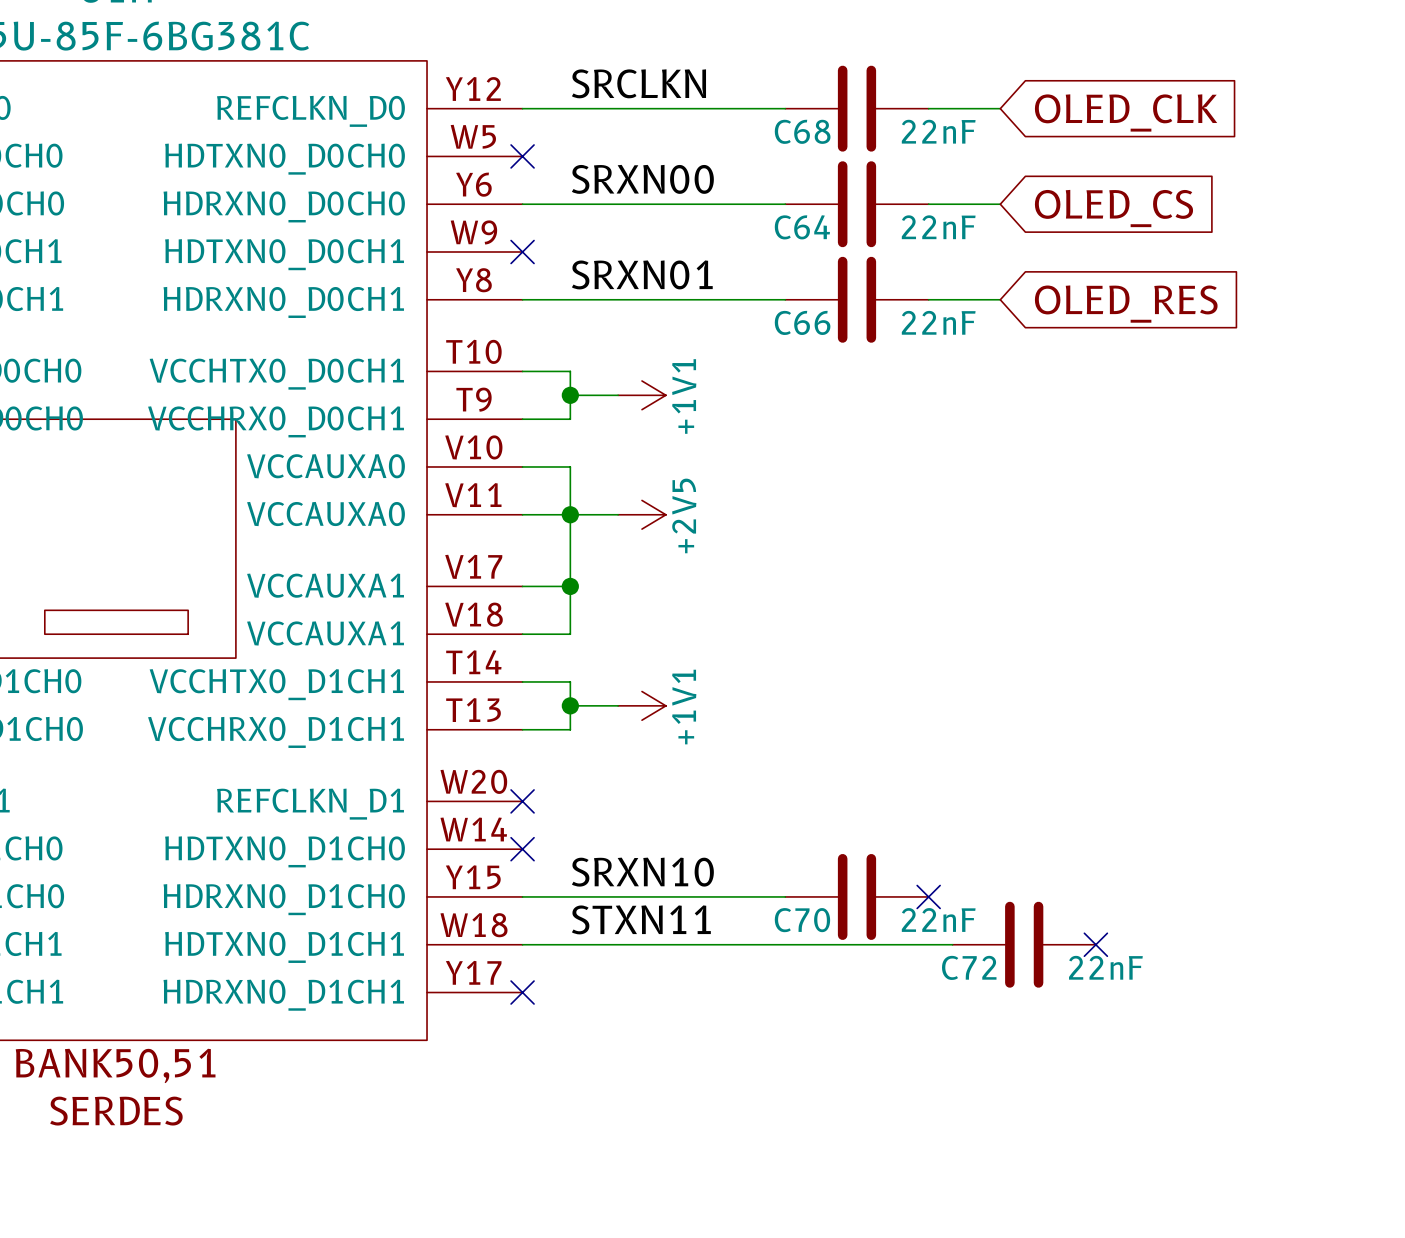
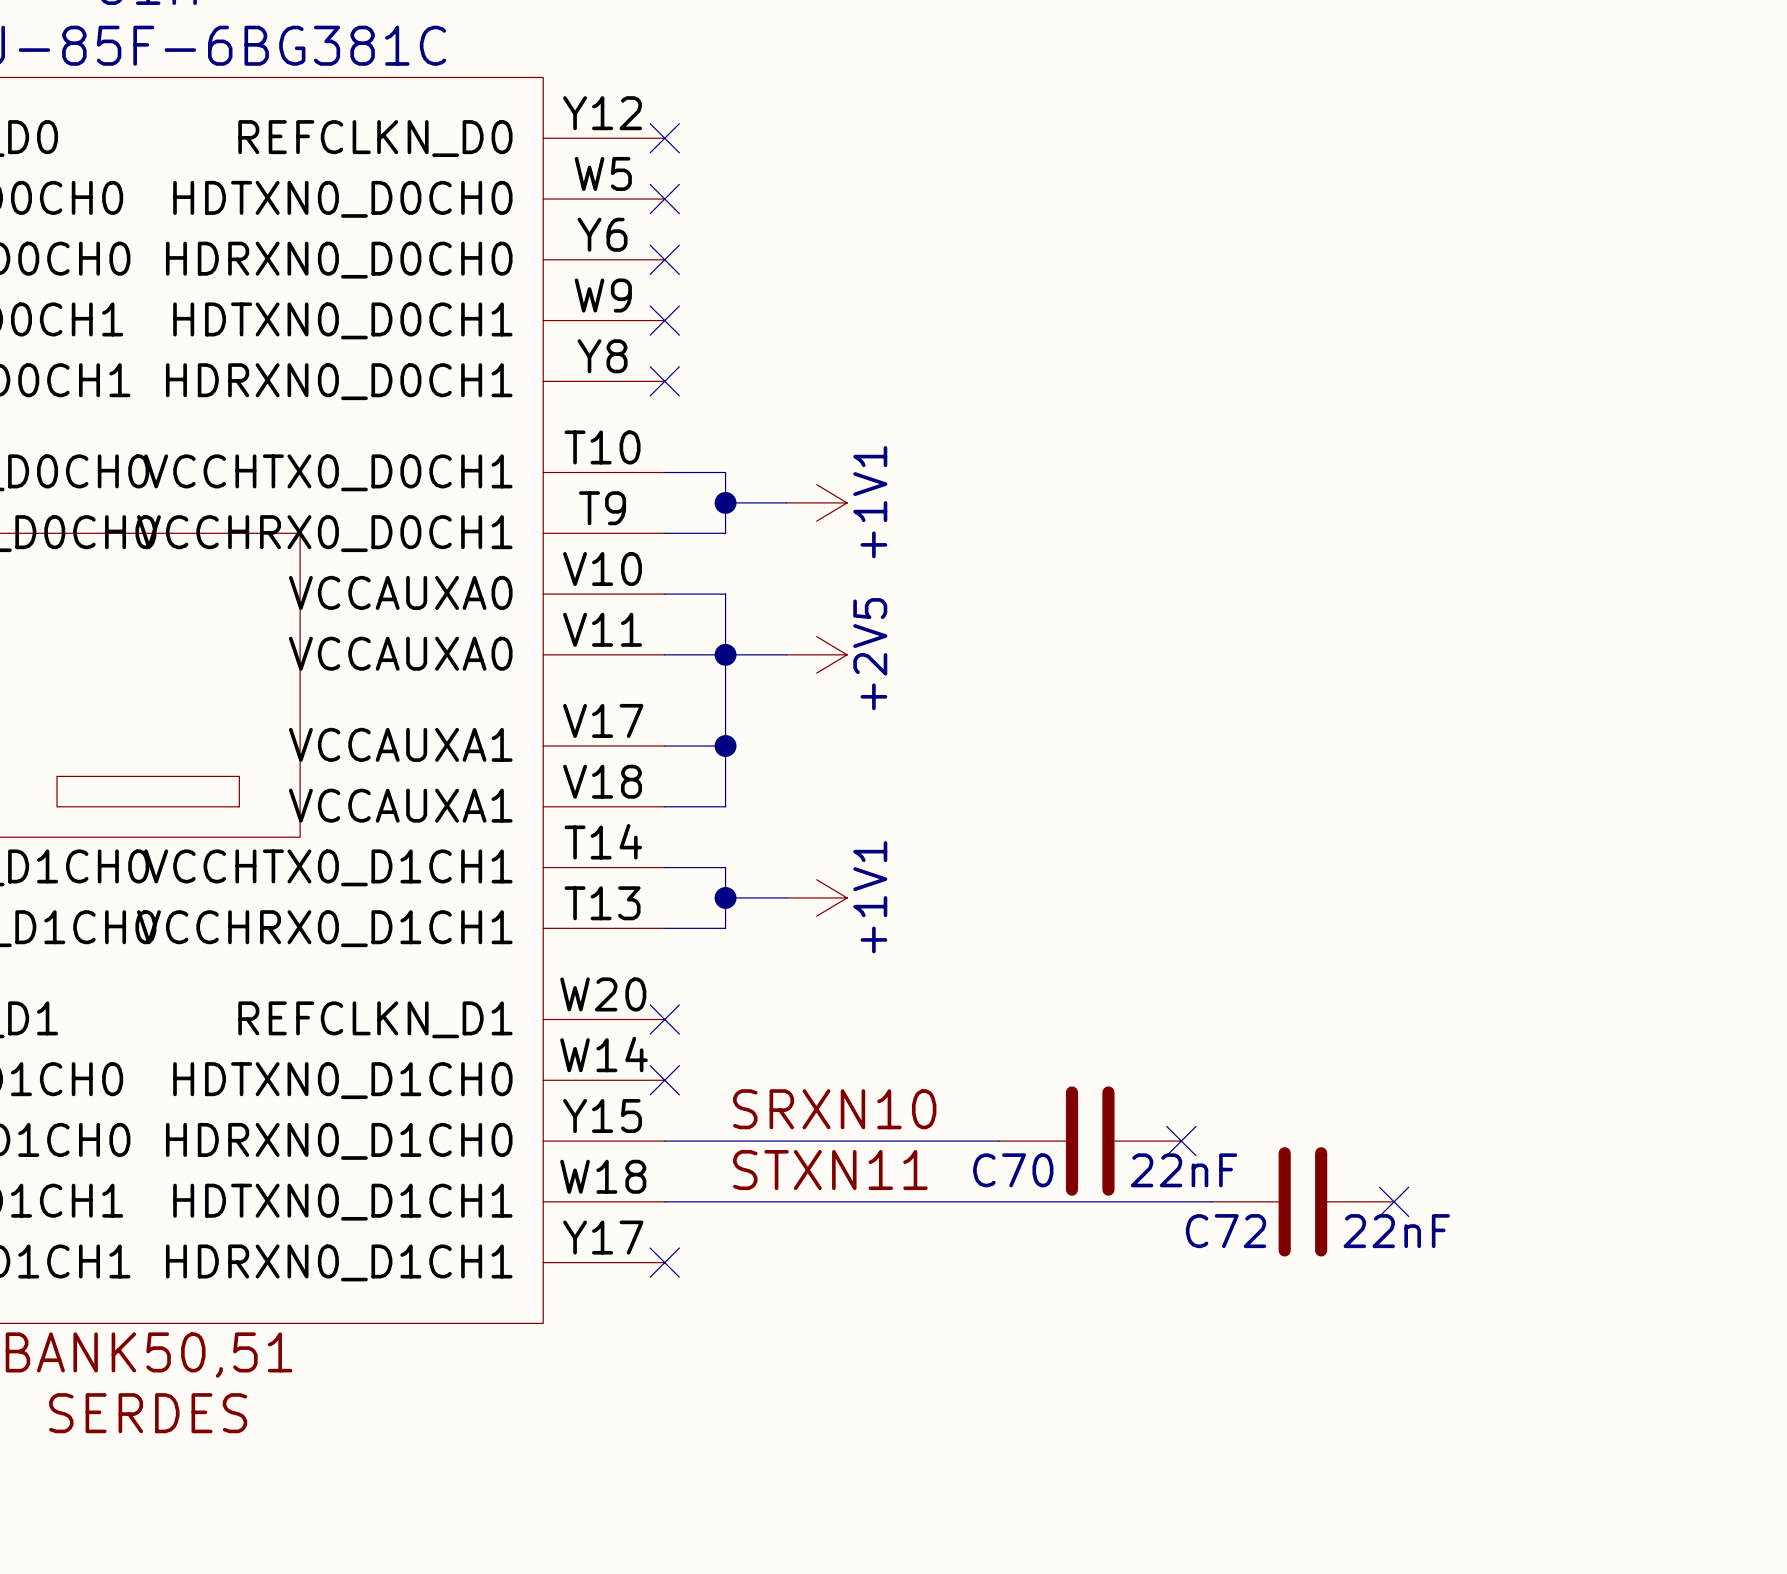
label: SRCLKN (638, 83) -> none
wire: (522, 108) (785, 108) -> none
no-connect mark: none -> (664, 138)
C68: 22nF (856, 108) -> none
wire: (928, 108) (1000, 108) -> none
global label: OLED_CLK (1126, 112) -> none
label: SRXN00 (642, 179) -> none
wire: (522, 204) (785, 204) -> none
no-connect mark: none -> (664, 259)
C64: 22nF (856, 204) -> none
wire: (928, 204) (1000, 204) -> none
global label: OLED_CS (1113, 208) -> none
label: SRXN01 (642, 274) -> none
wire: (522, 299) (785, 299) -> none
no-connect mark: none -> (664, 381)
C66: 22nF (856, 299) -> none
wire: (928, 299) (1000, 299) -> none
global label: OLED_RES (1126, 304) -> none

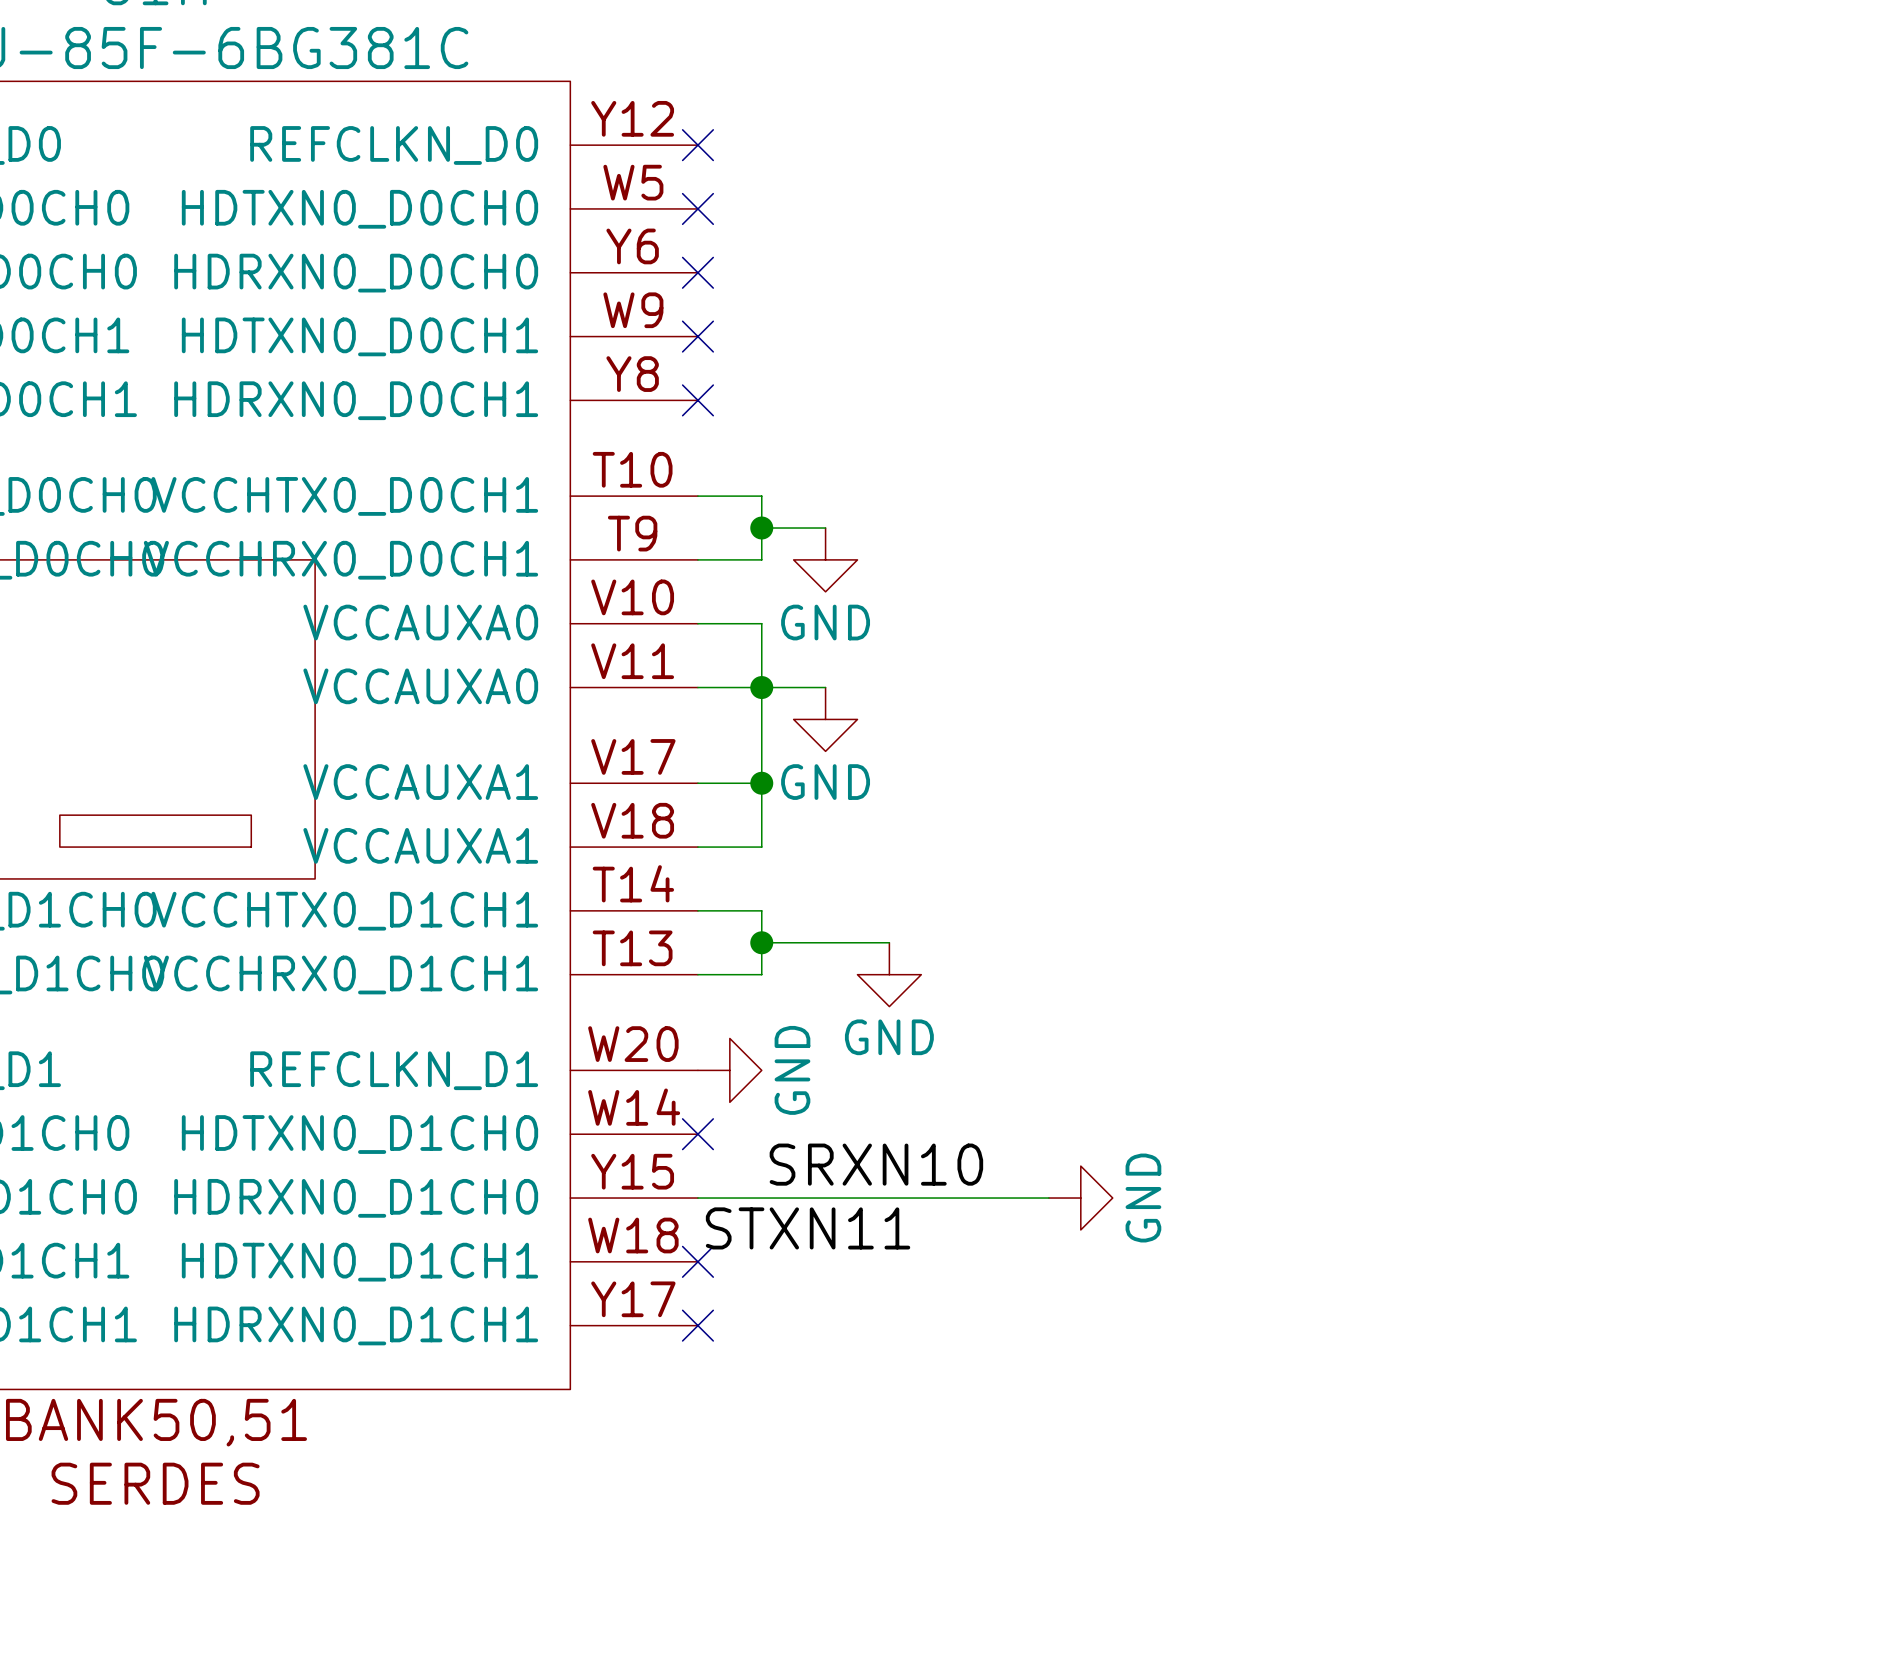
power symbol: +1V1 (816, 502) -> none
power symbol: none -> GND (825, 559)
power symbol: +2V5 (816, 654) -> none
power symbol: none -> GND (825, 719)
power symbol: +1V1 (816, 897) -> none
power symbol: none -> GND (889, 974)
no-connect mark: (664, 1019) -> none
power symbol: none -> GND (729, 1070)
power symbol: none -> GND (1080, 1198)
C70: 22nF (1090, 1141) -> none
no-connect mark: (1181, 1141) -> none
label position: STXN11 (830, 1170) -> STXN11 (808, 1228)
wire: (664, 1201) (1211, 1201) -> none
no-connect mark: none -> (697, 1261)
C72: 22nF (1302, 1201) -> none
no-connect mark: (1394, 1201) -> none

